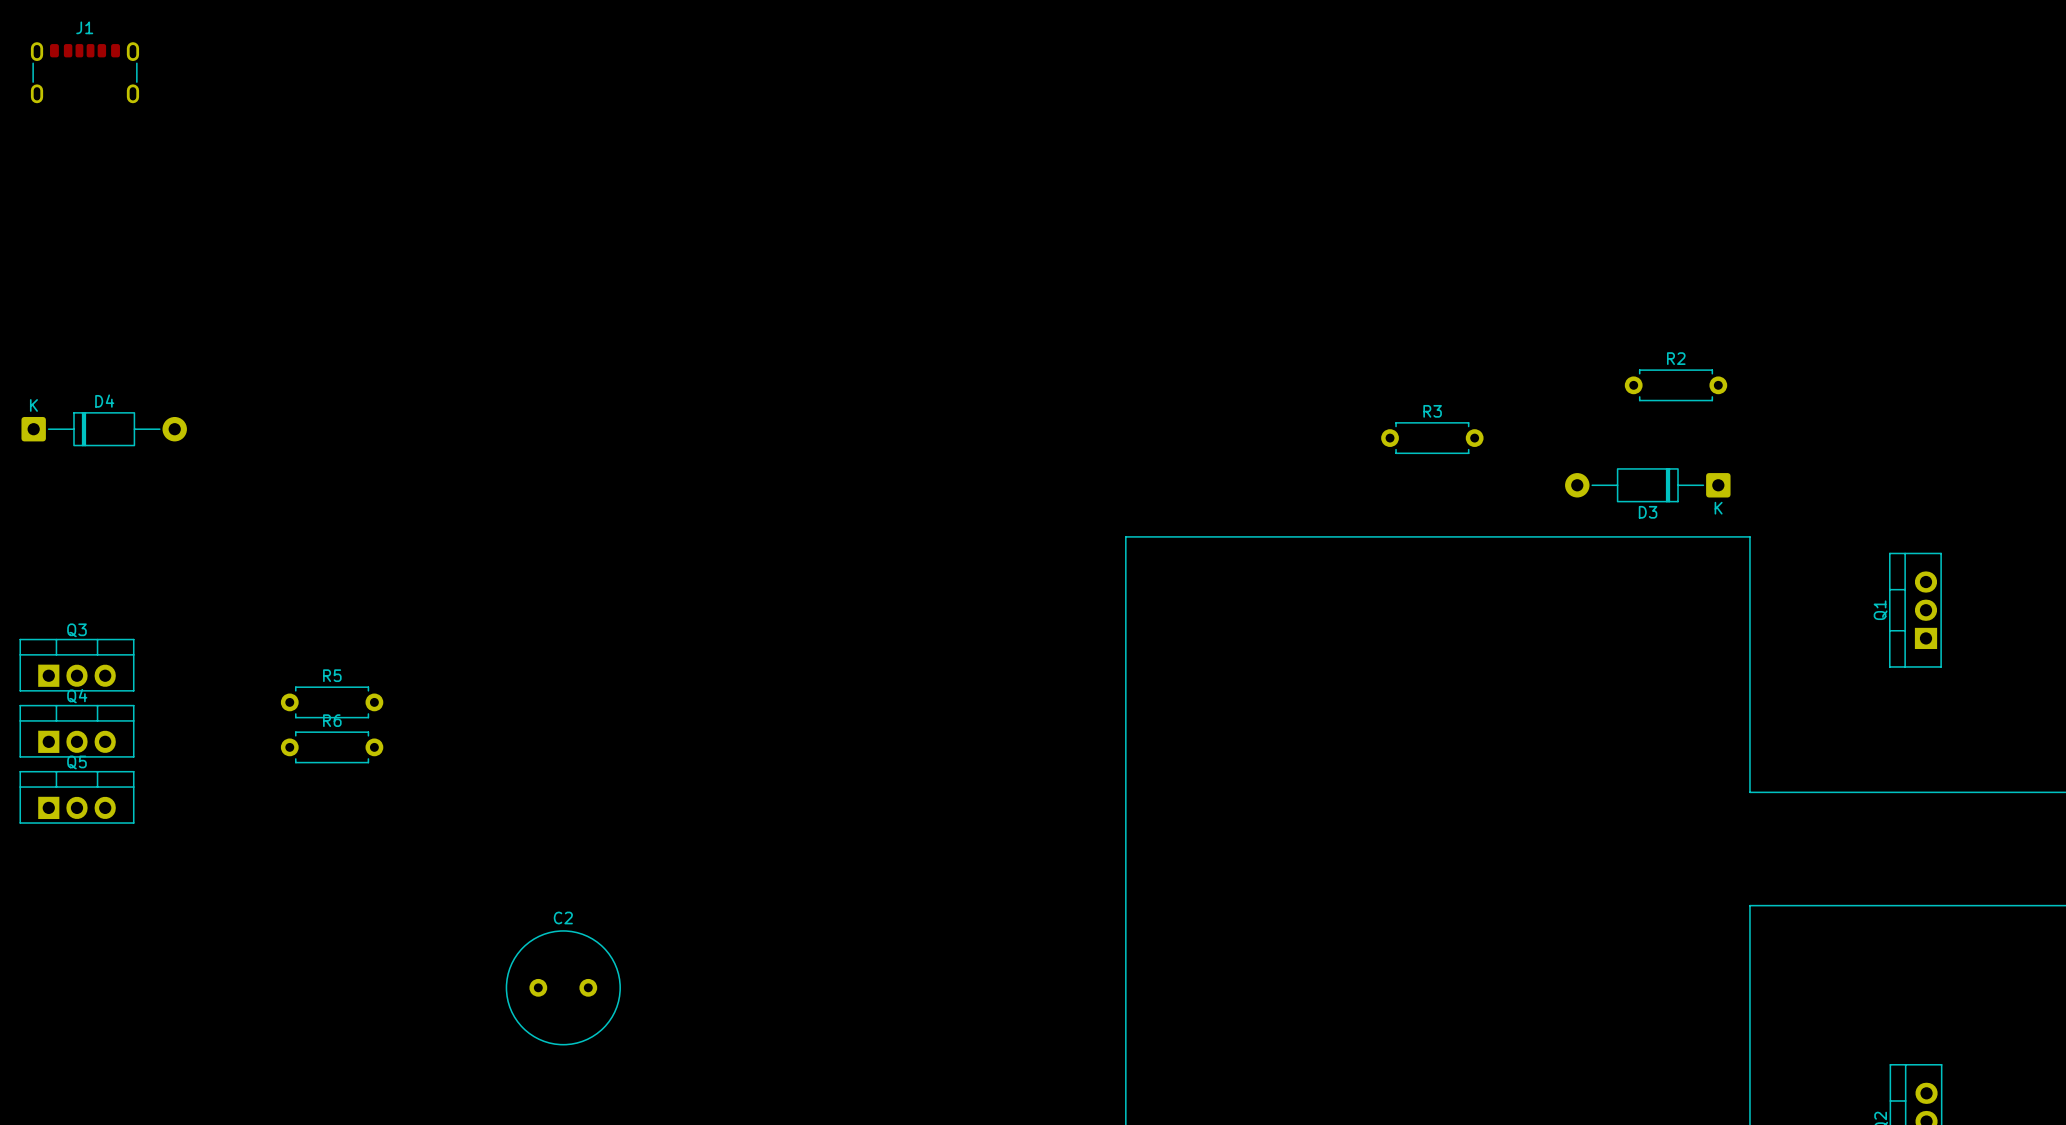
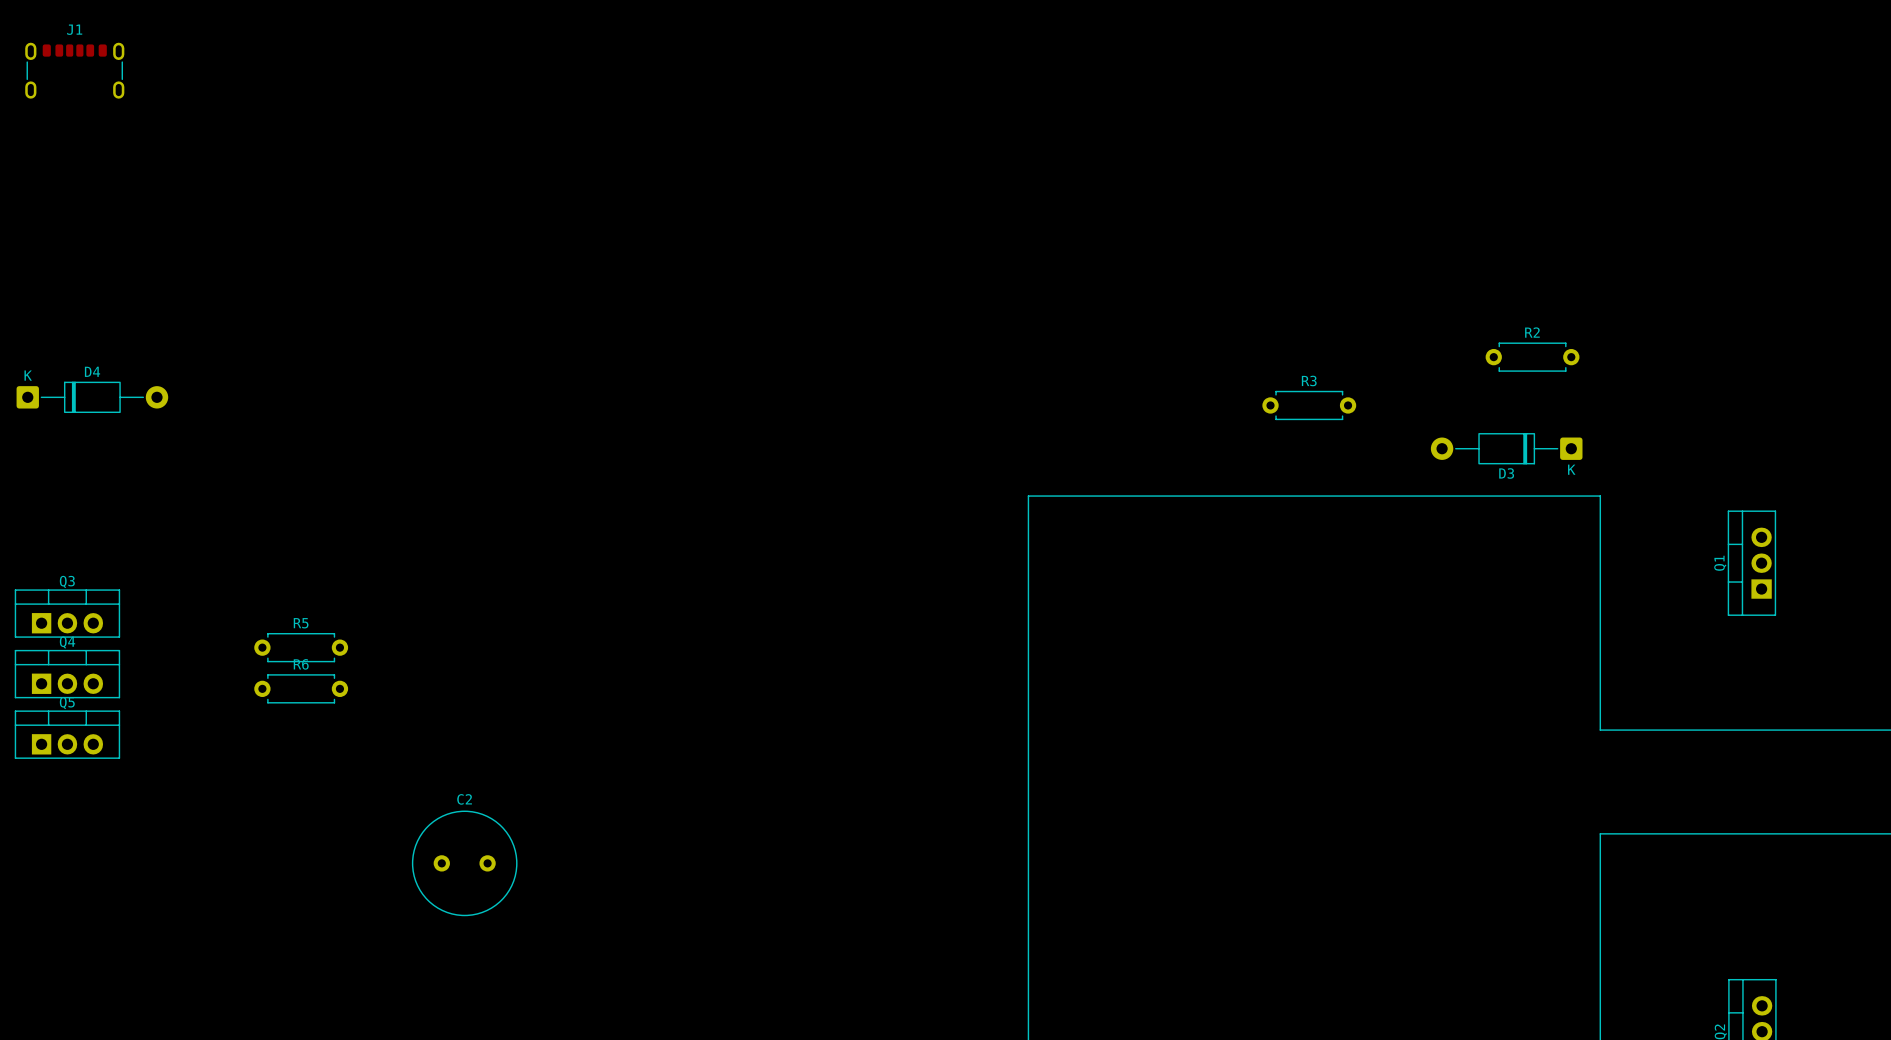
C2 position: (563, 987) -> (464, 863)

